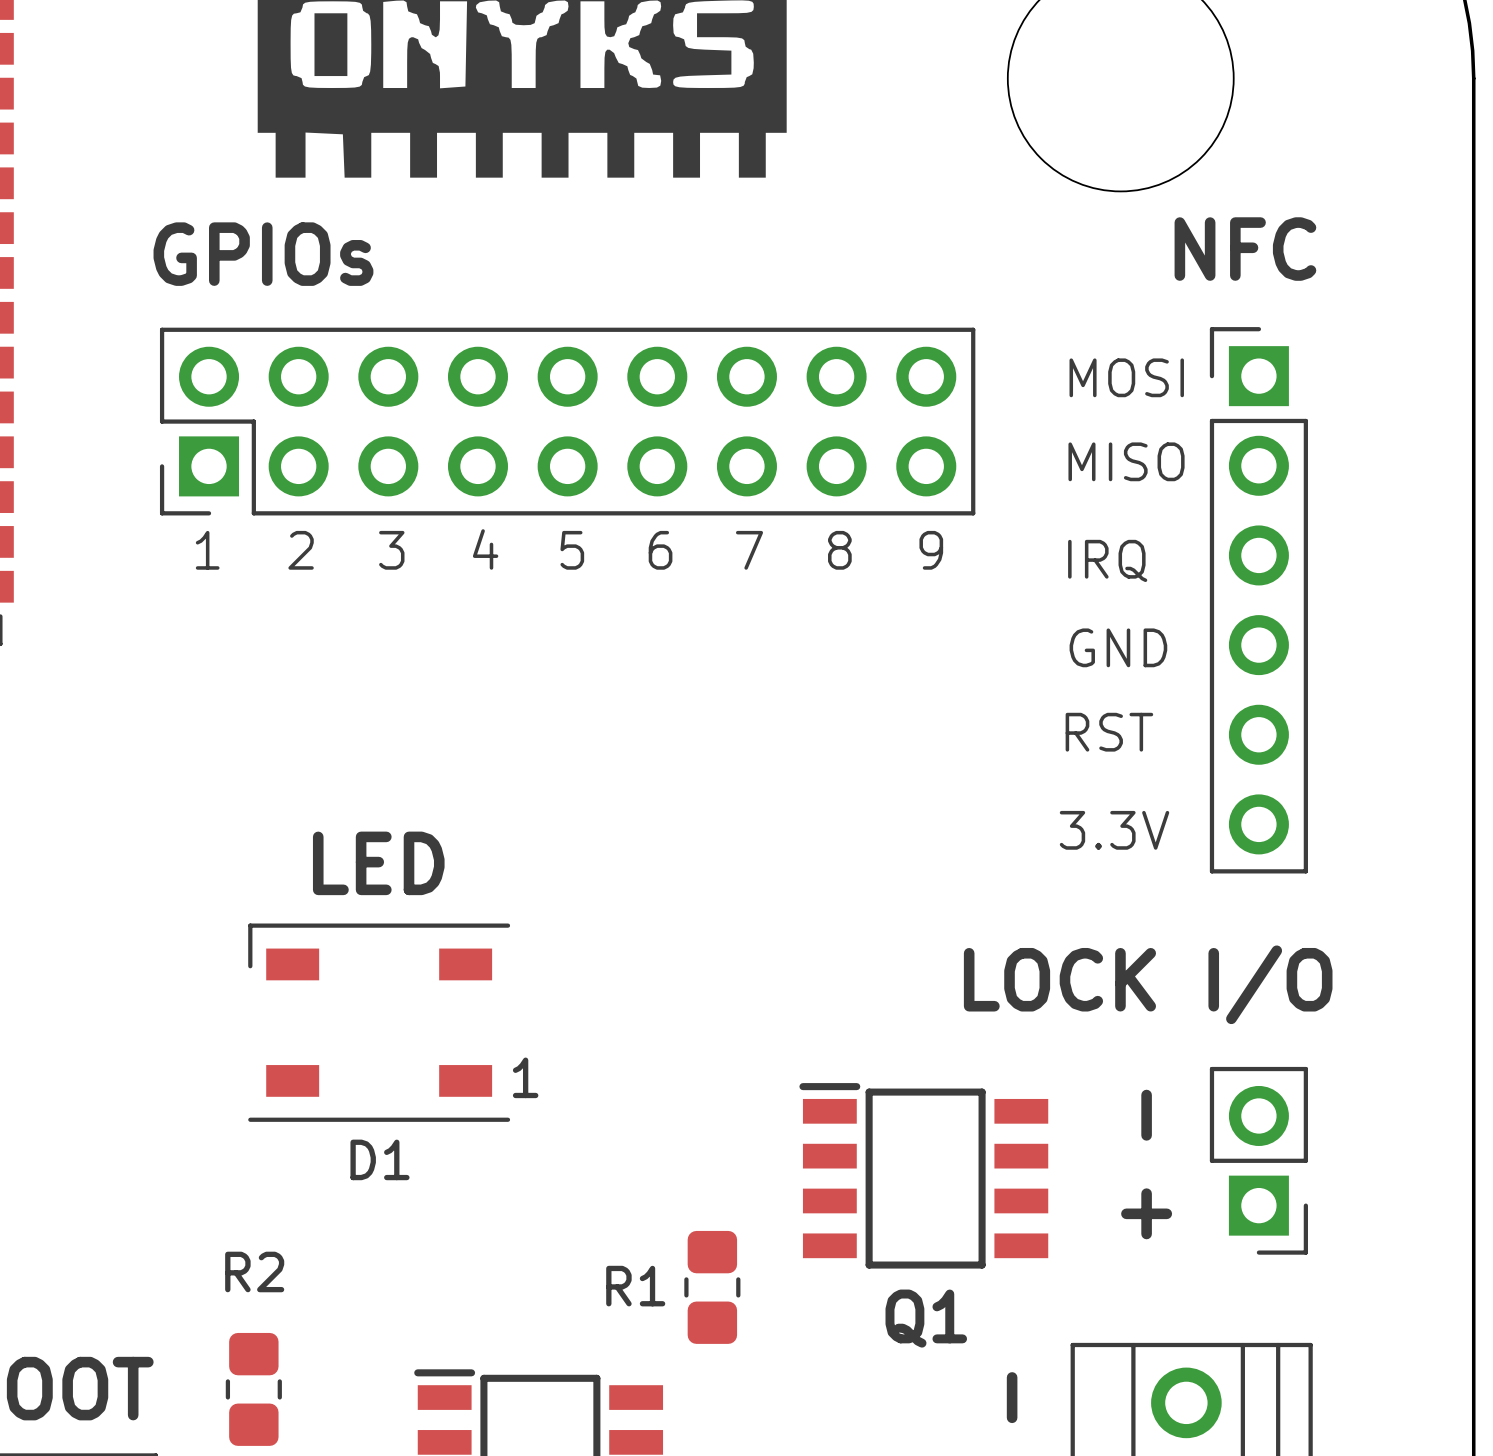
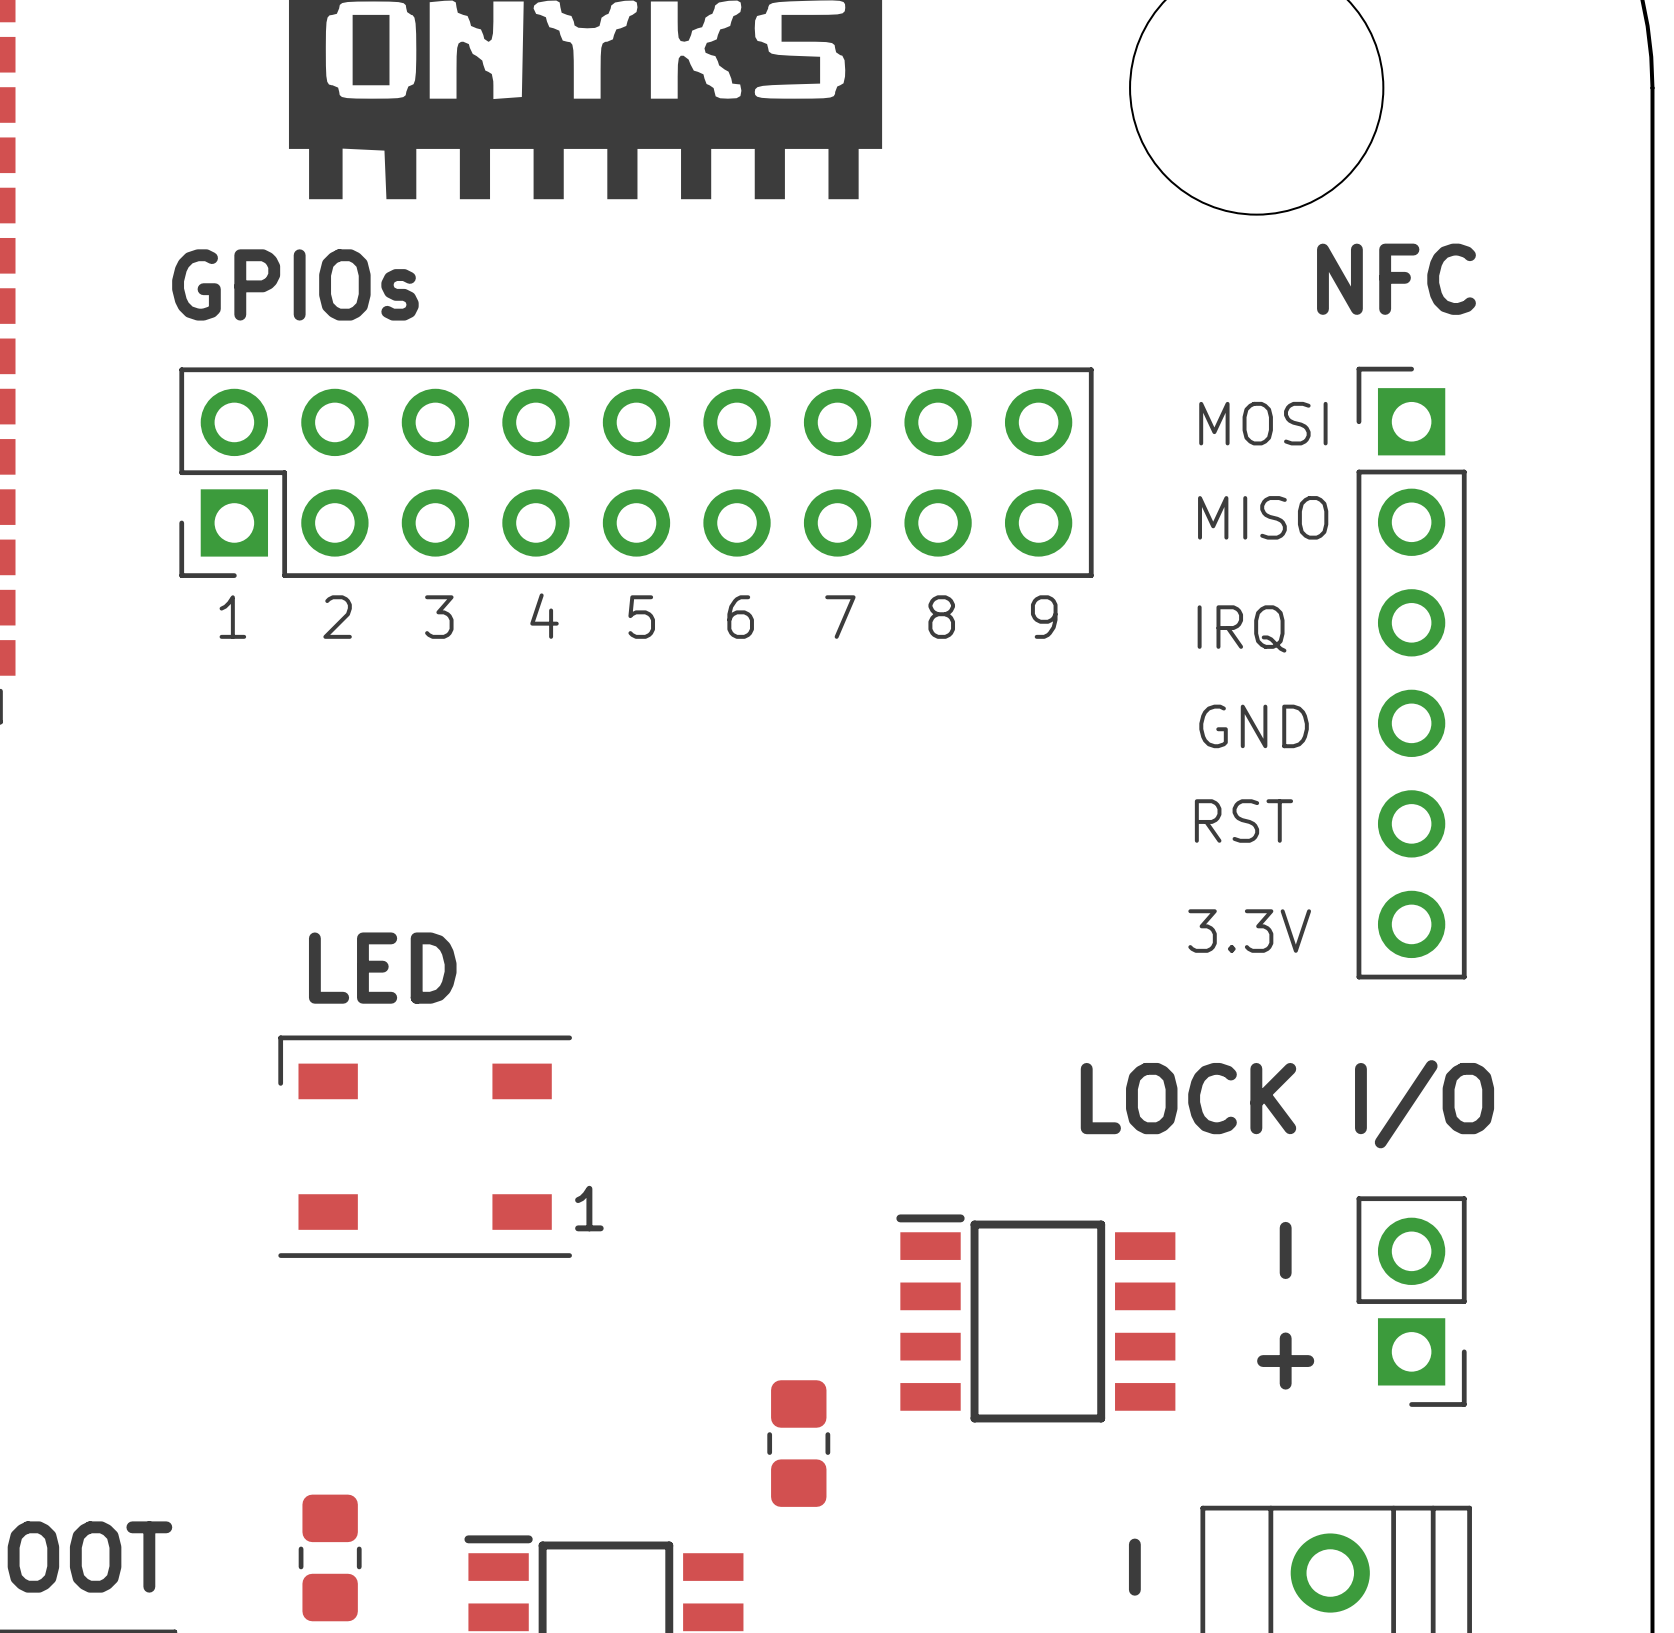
text position: LED (378, 863) -> LED (382, 968)
D1 name: D1 (379, 1159) -> none
R1 name: R1 (635, 1286) -> none
Q1 name: Q1 (926, 1318) -> none
R2: (253, 1389) -> none
part: none -> (330, 1557)

